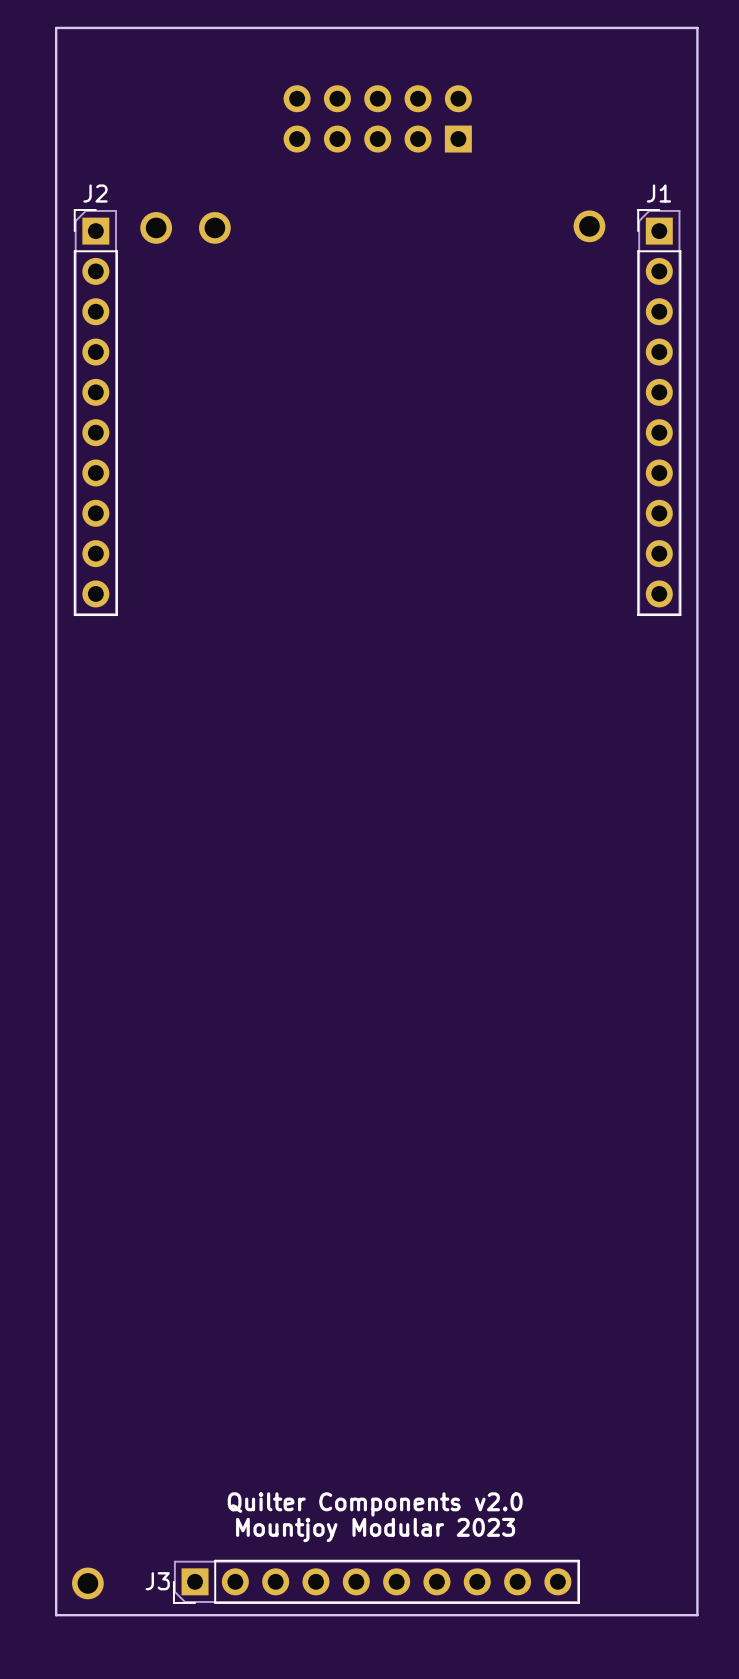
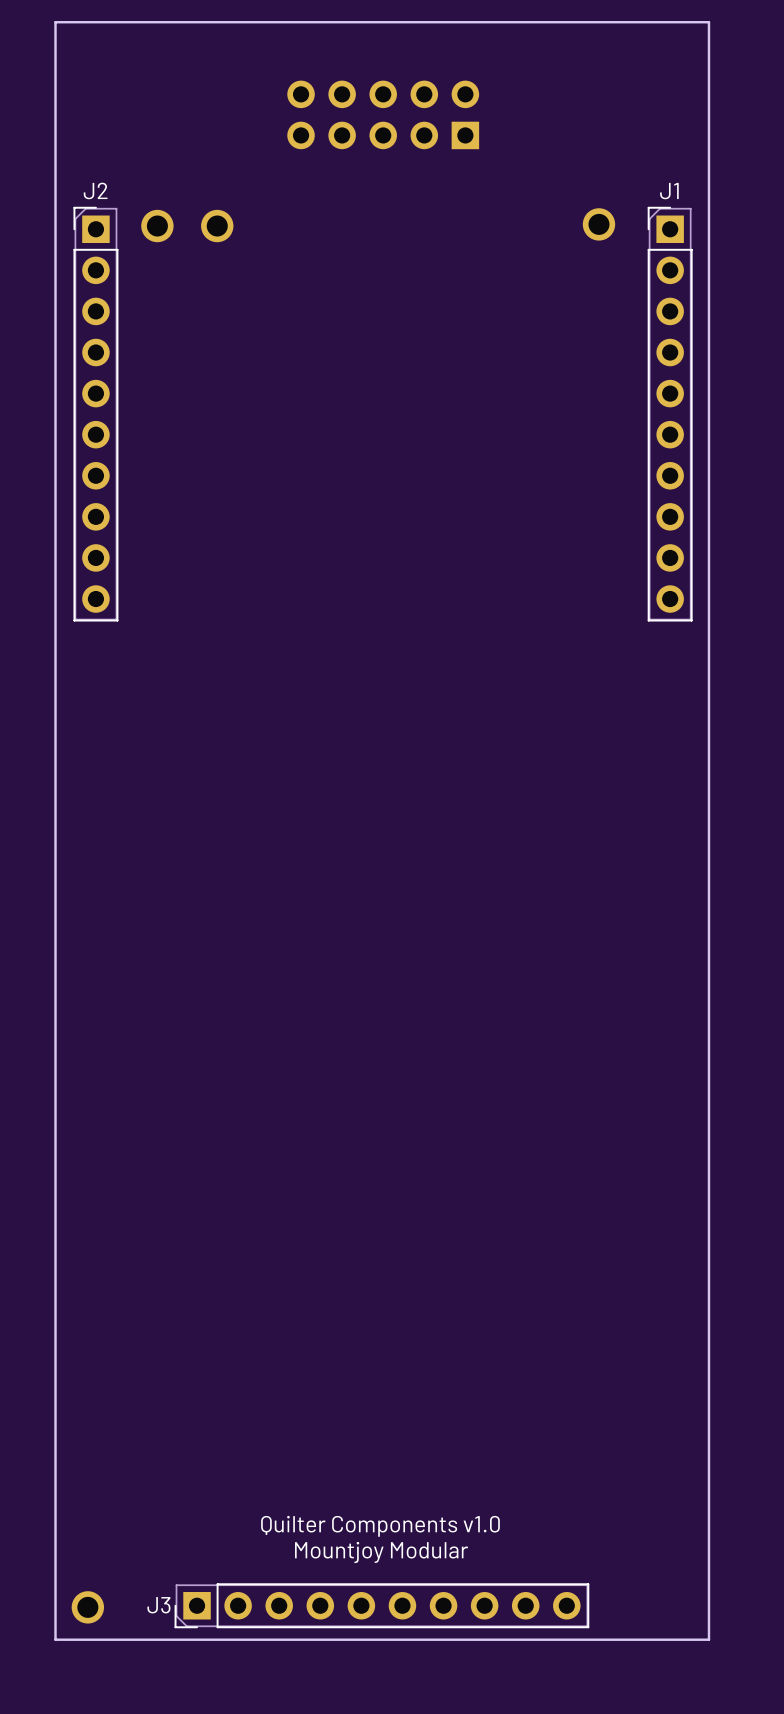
text: Quilter Components v2.0 (375, 1504) -> Quilter Components v1.0 (380, 1526)
text: Mountjoy Modular 2023 (375, 1530) -> Mountjoy Modular (381, 1552)

